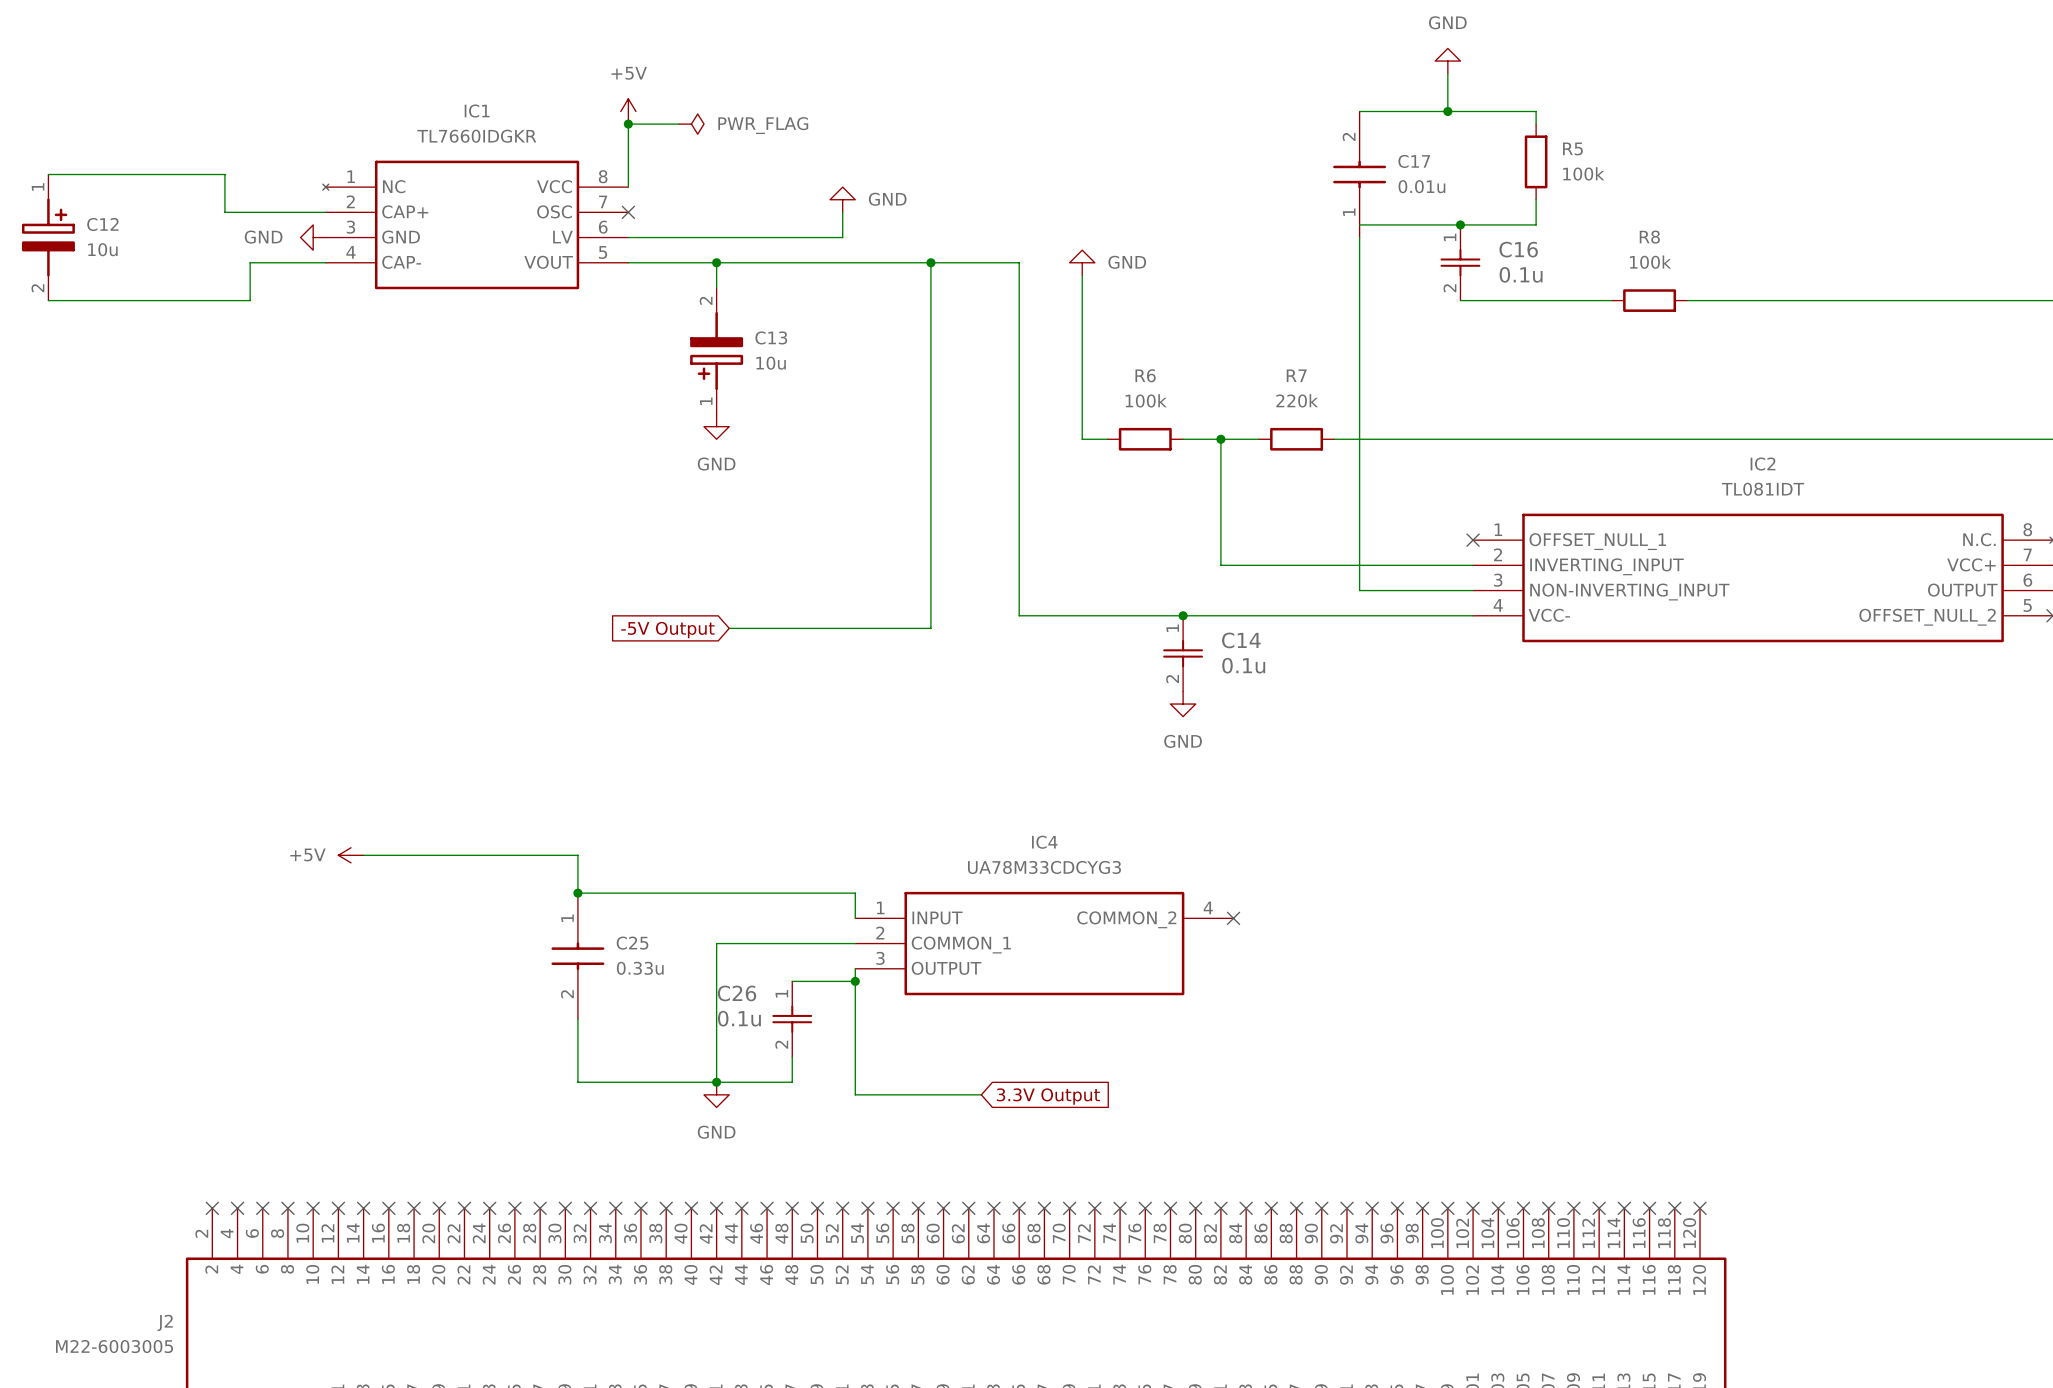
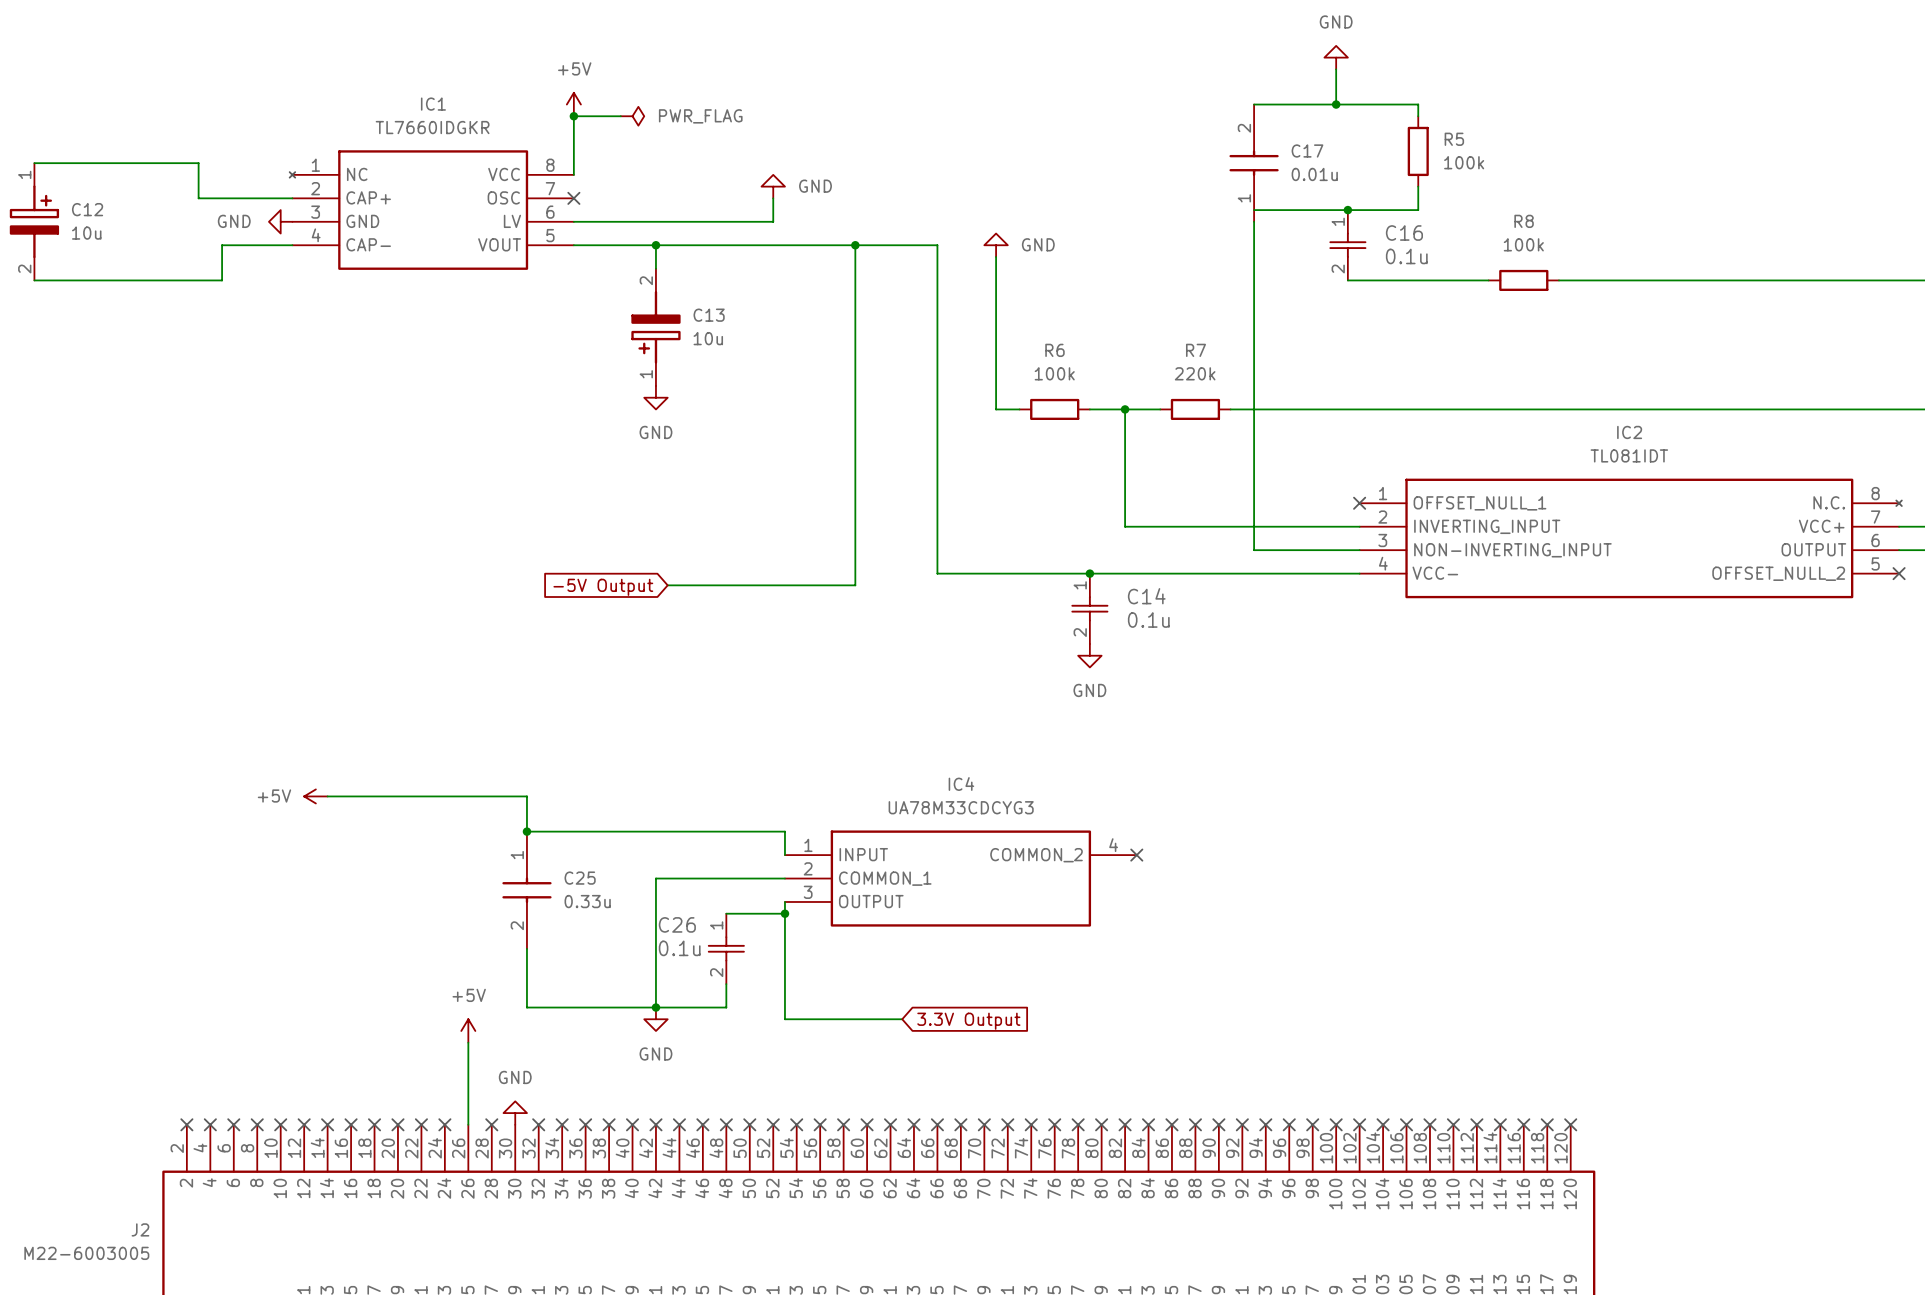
power symbol: none -> +5V (468, 1030)
wire: none -> (468, 1042) (468, 1124)
power symbol: none -> GND (515, 1113)
no-connect mark: (514, 1208) -> none
no-connect mark: (565, 1208) -> none

